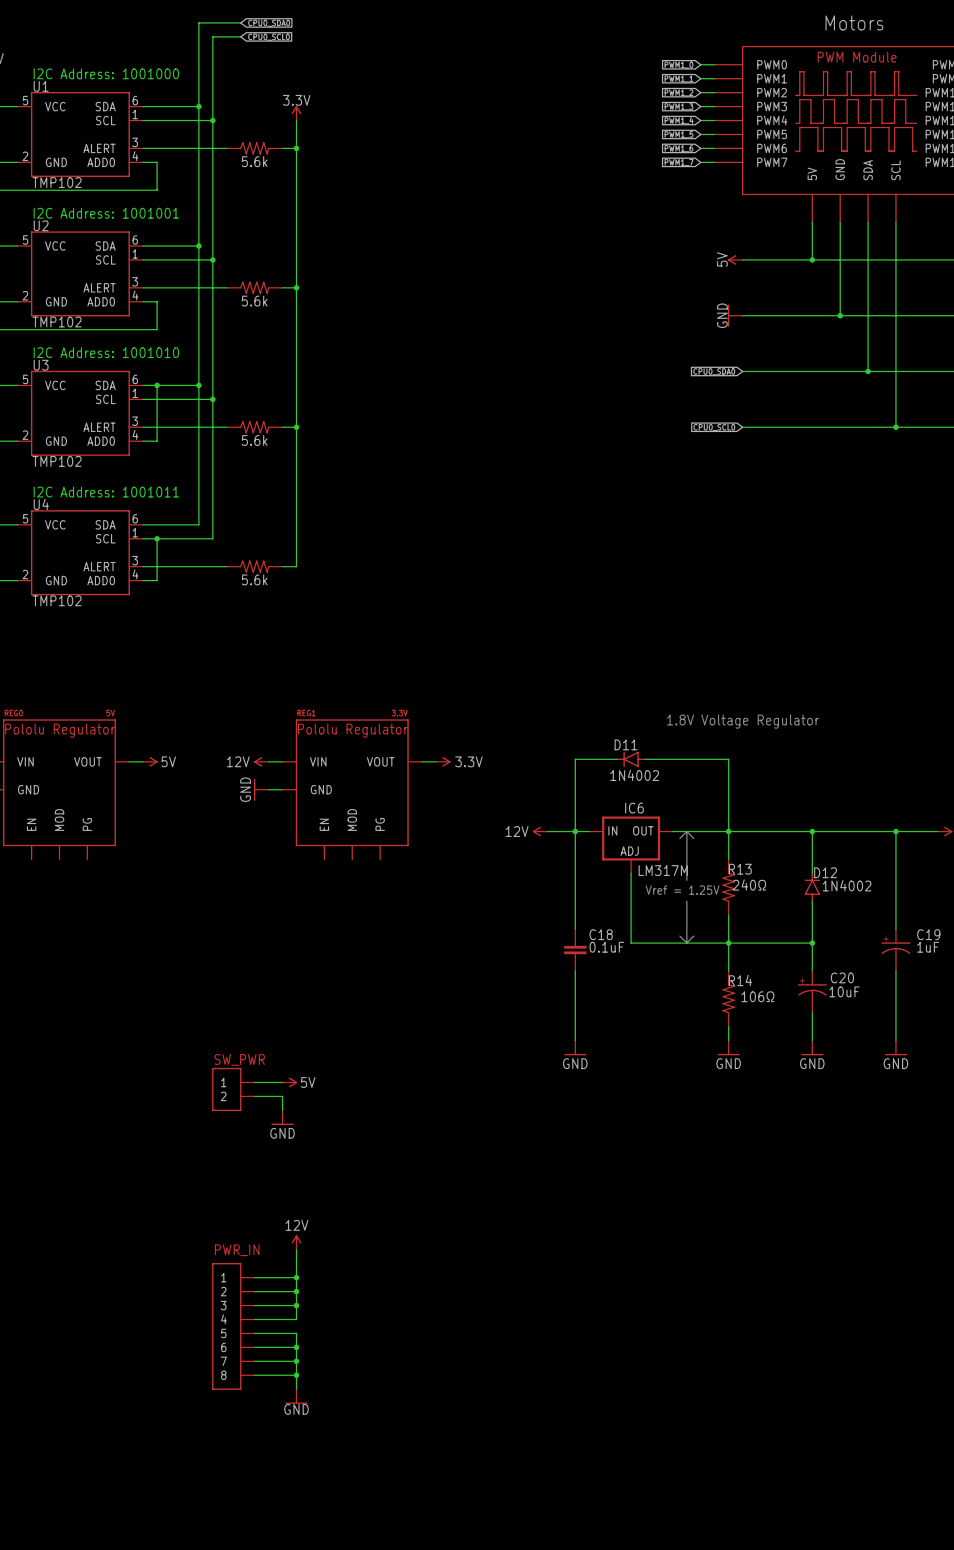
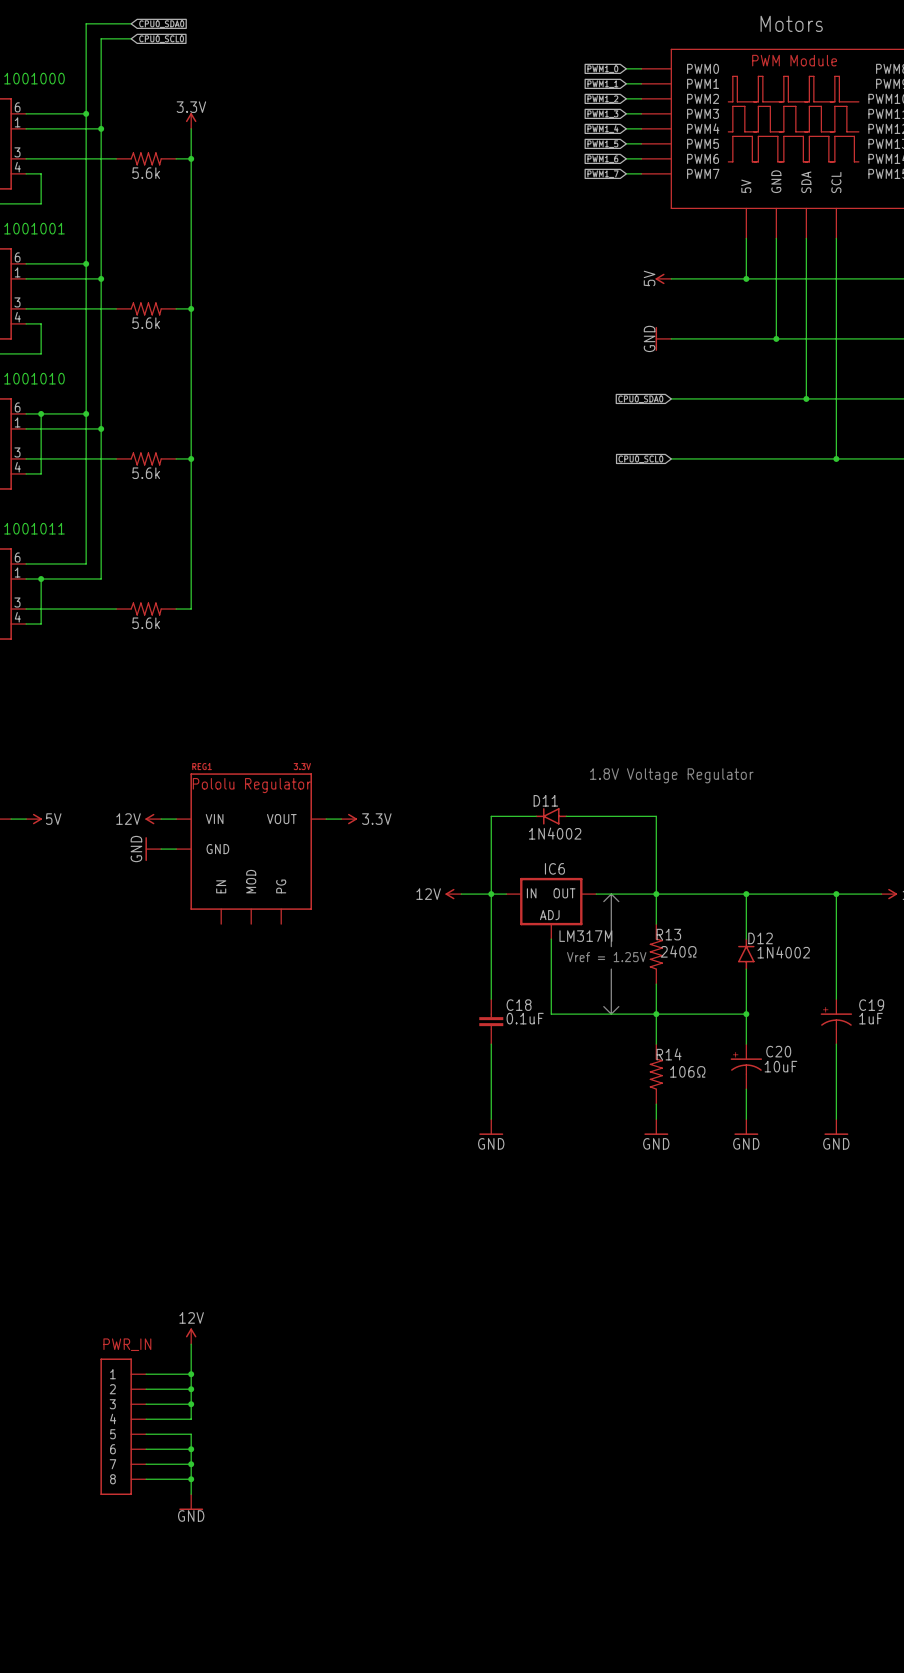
wire: (254, 1082) (282, 1082) -> none
power symbol: 5V (289, 1082) -> none
SW_PWR: (233, 1089) -> none
wire: (254, 1096) (282, 1096) (282, 1110) -> none
power symbol: GND (282, 1117) -> none

